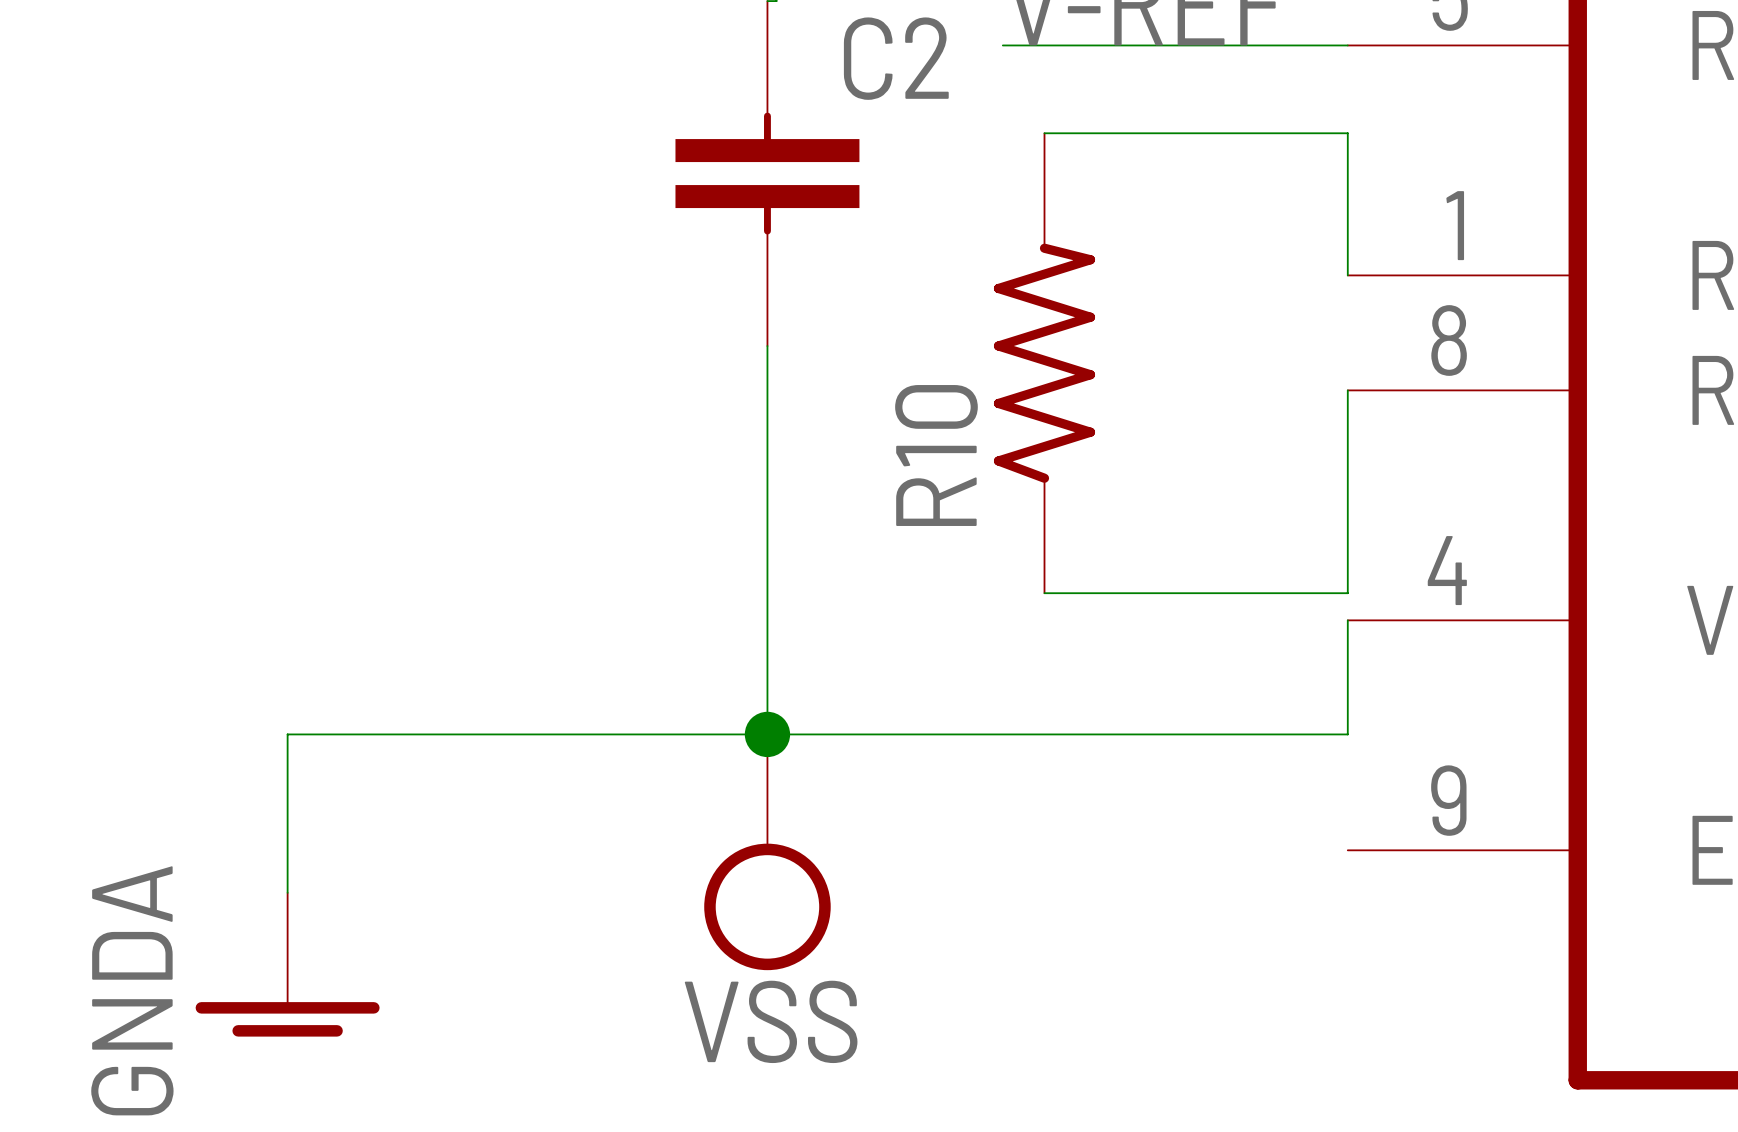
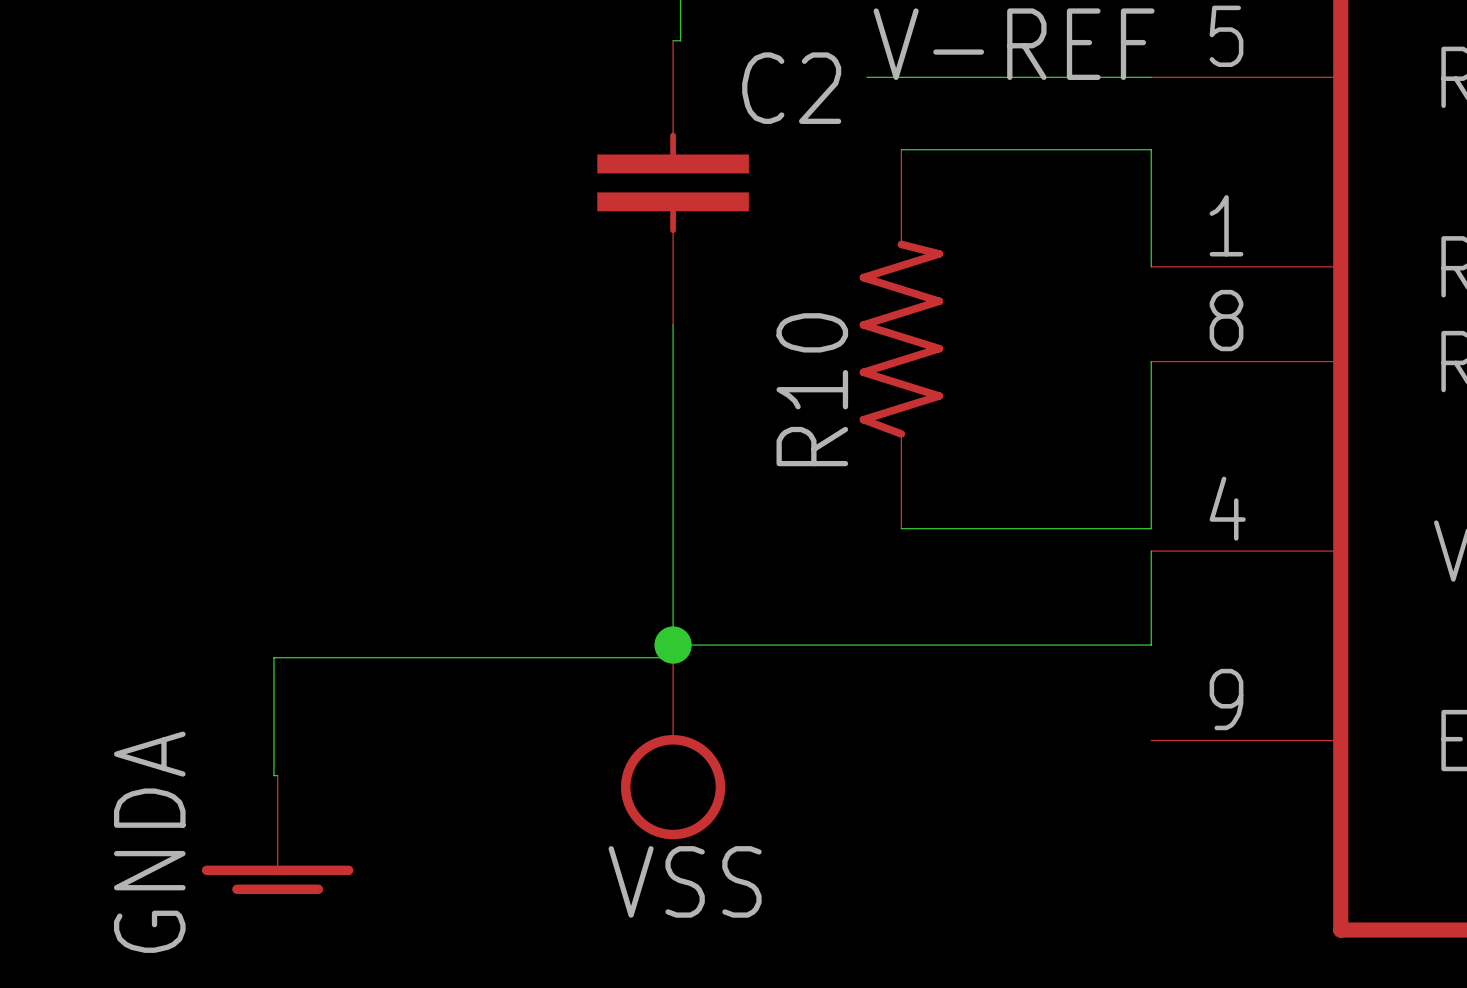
wire: (767, 734) (287, 734) (287, 892) -> (673, 657) (273, 657) (273, 775) (277, 775)

